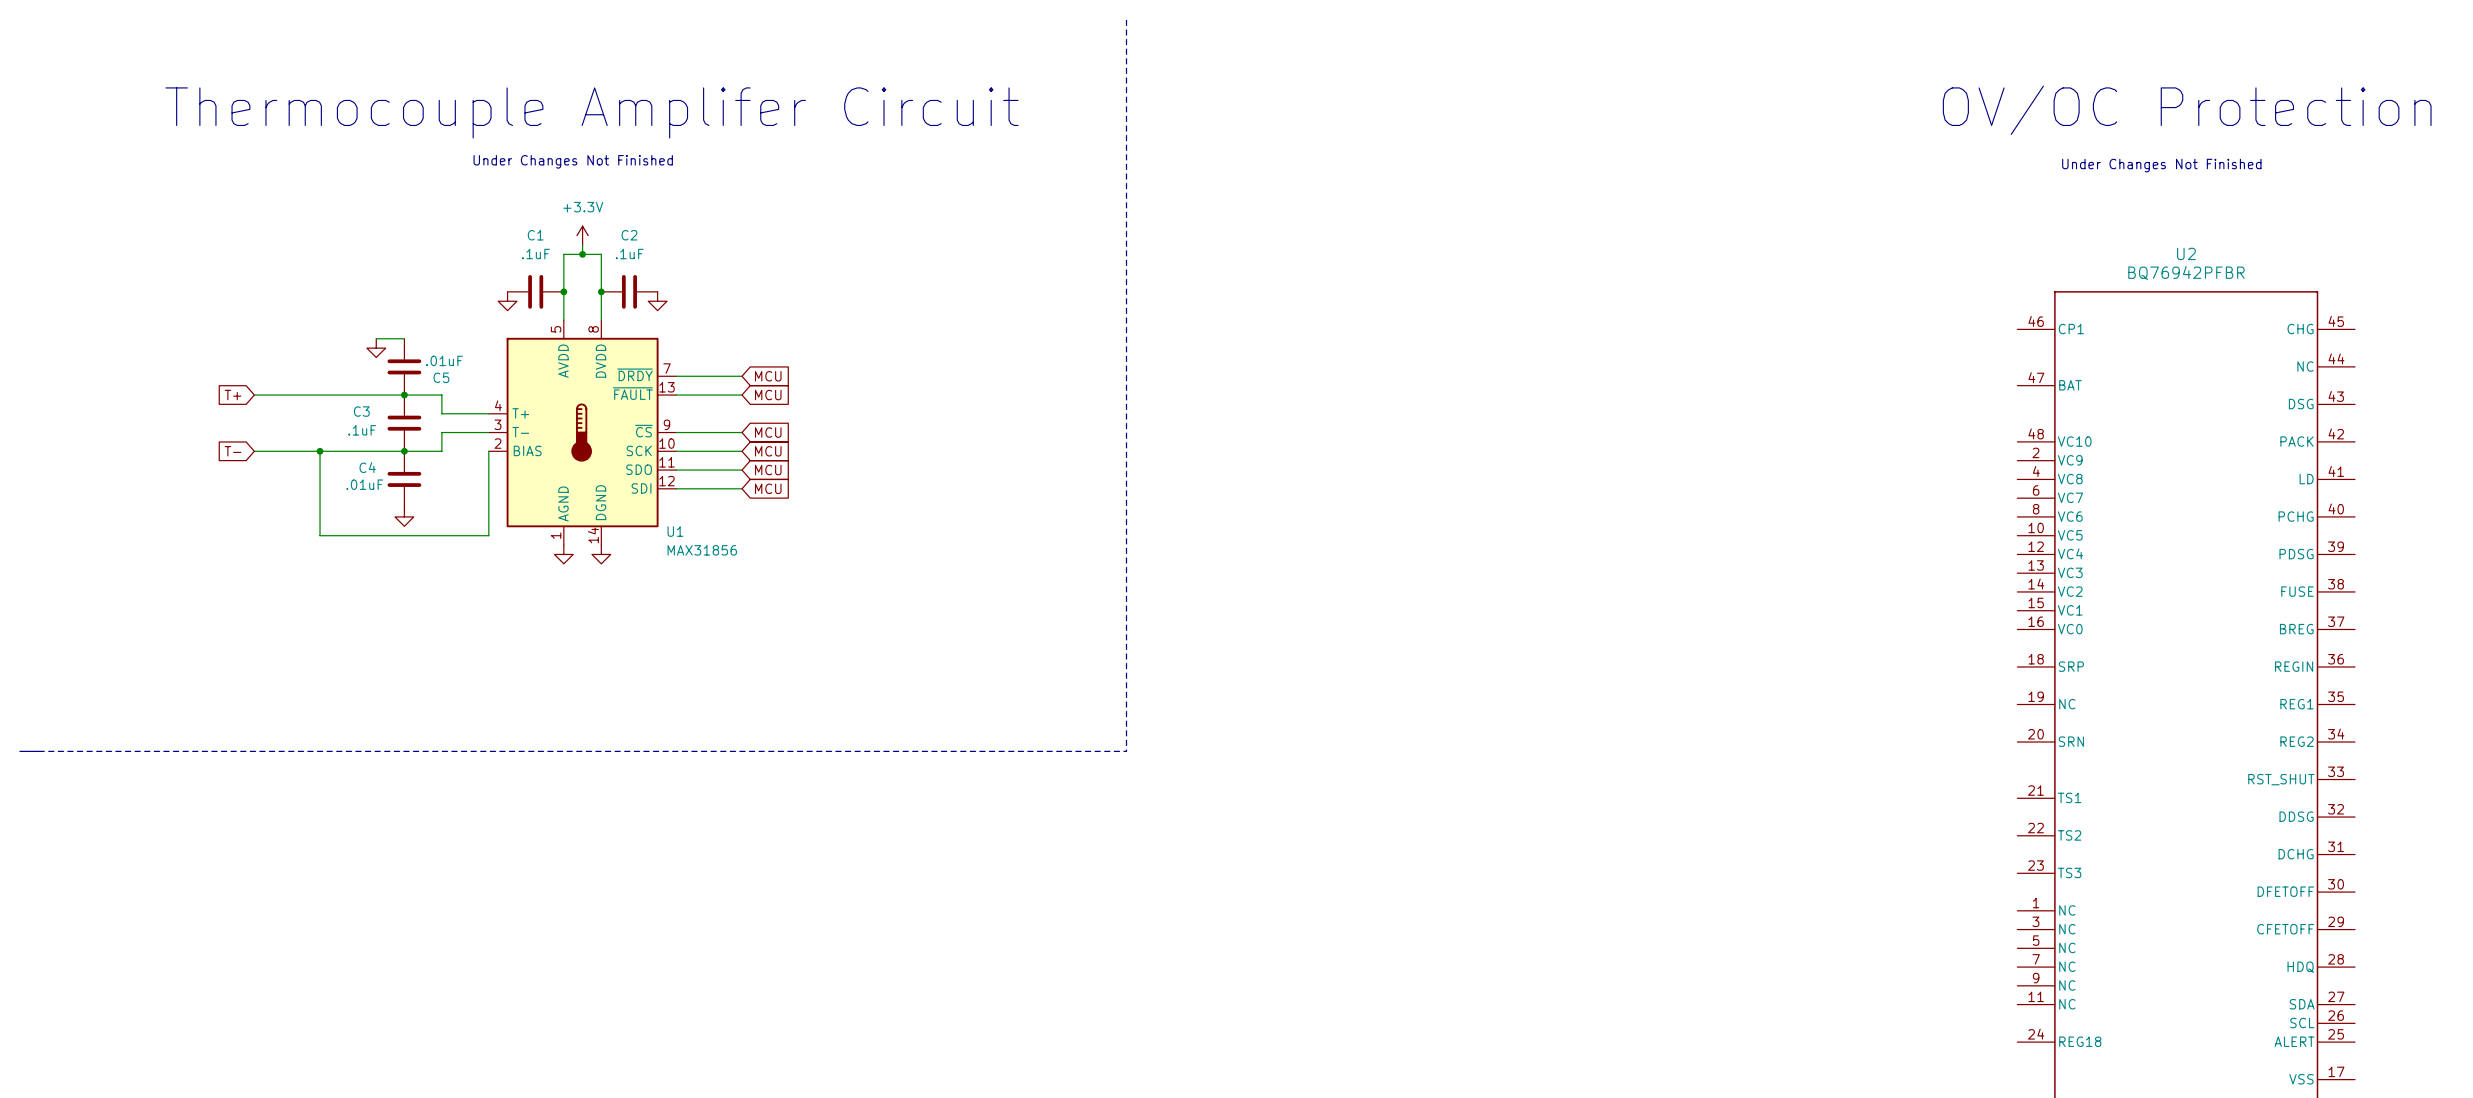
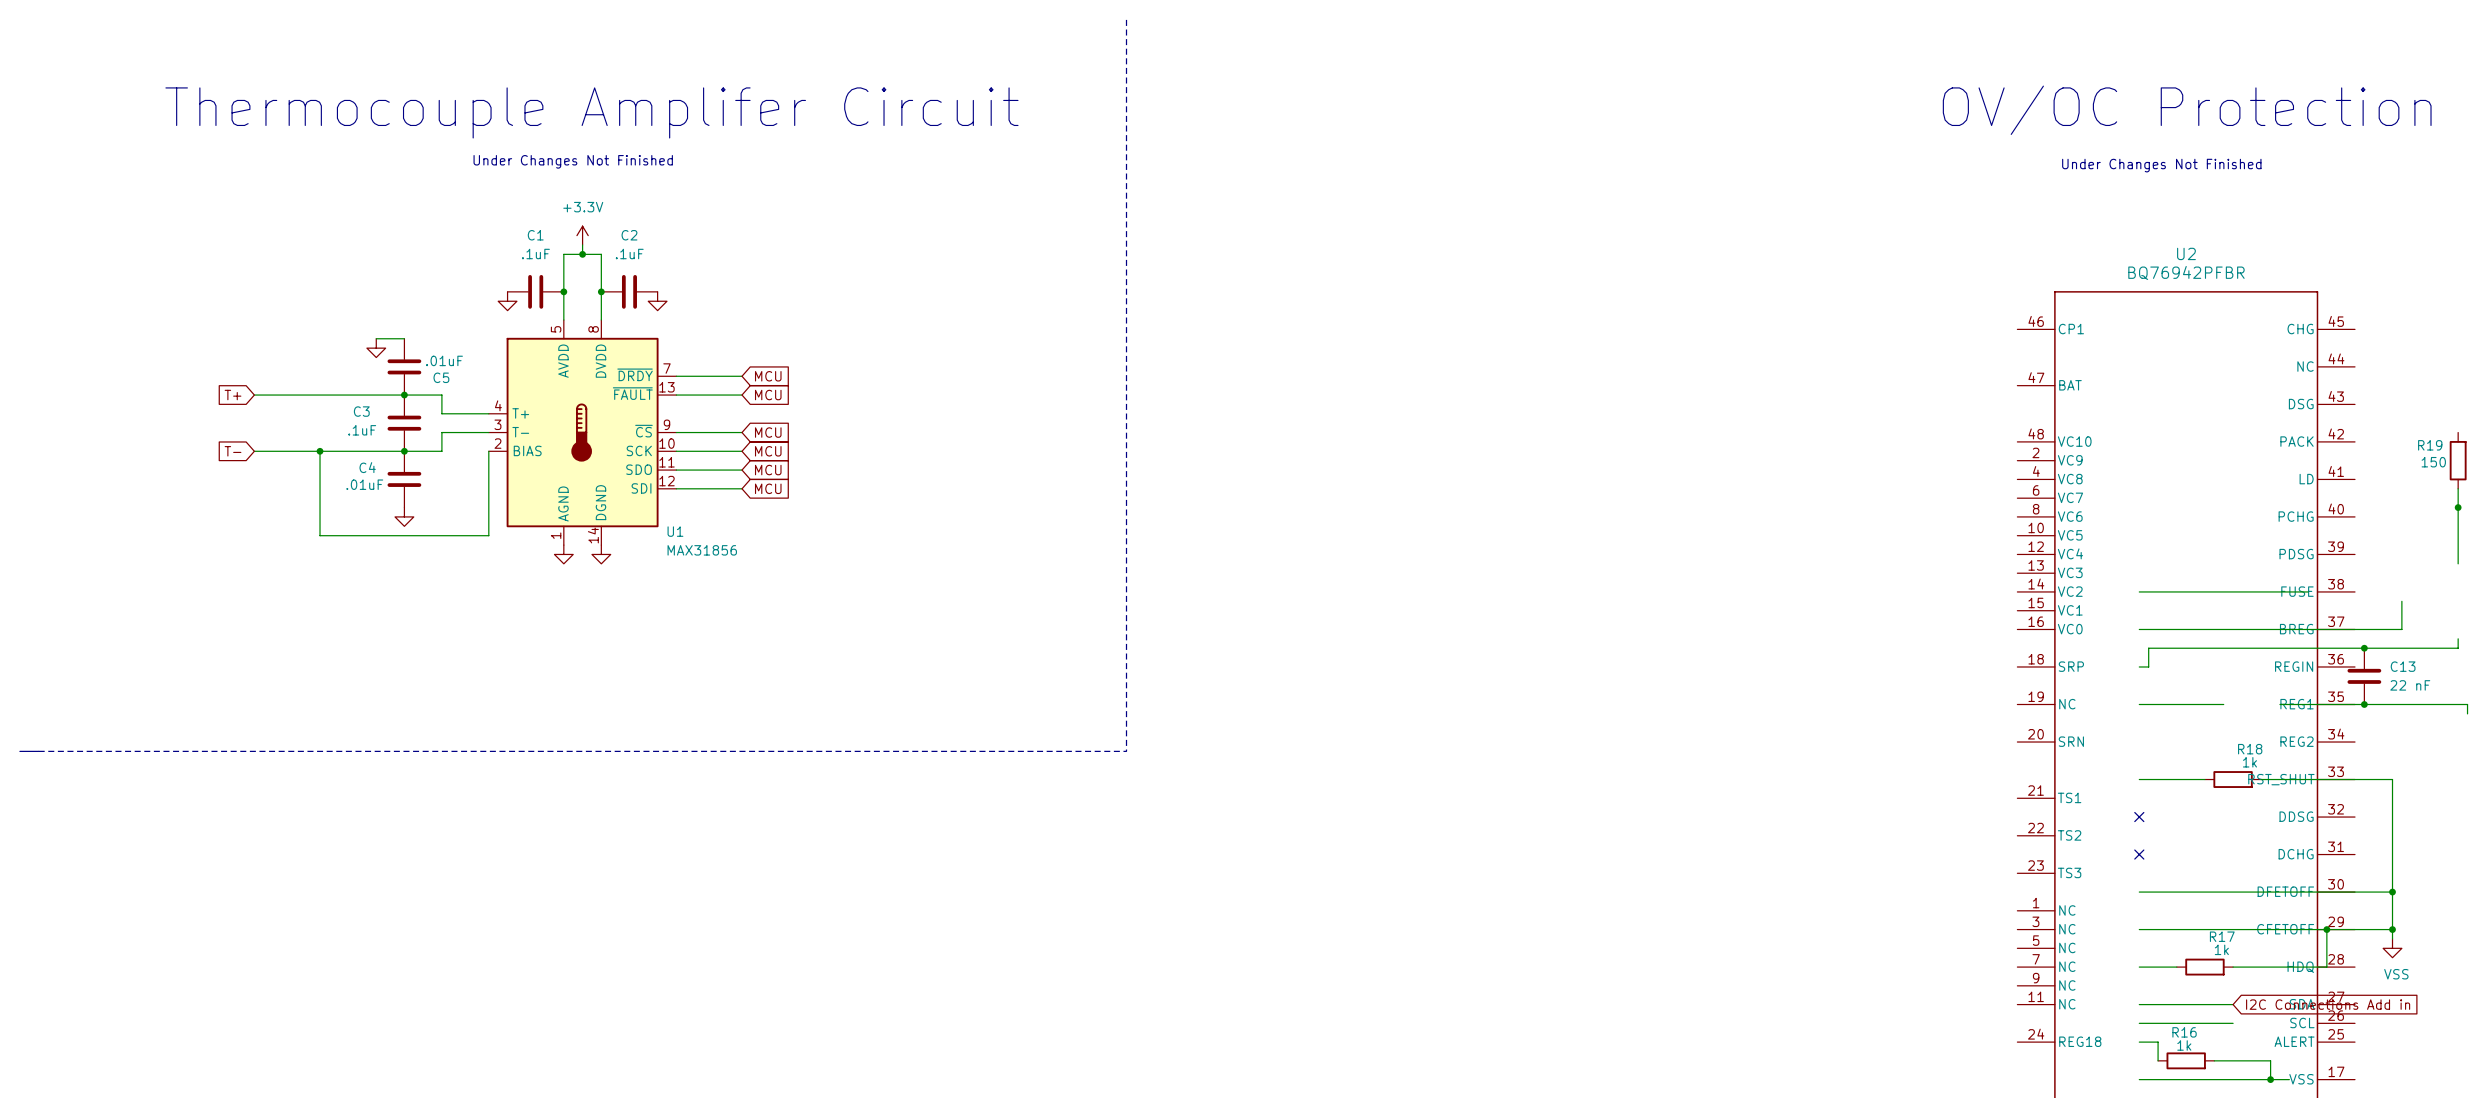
R19: none -> 150 (2458, 460)
wire: none -> (2458, 488) (2458, 563)
junction: none -> (2458, 507)
wire: none -> (2139, 591) (2308, 591)
wire: none -> (2401, 601) (2401, 629) (2139, 629)
wire: none -> (2458, 638) (2458, 648) (2148, 648) (2148, 666) (2139, 666)
junction: none -> (2364, 648)
C13: none -> 22 nF (2364, 676)
wire: none -> (2139, 704) (2223, 704)
wire: none -> (2279, 704) (2467, 704) (2467, 713)
junction: none -> (2364, 704)
wire: none -> (2139, 779) (2204, 779)
R18: none -> 1k (2233, 779)
wire: none -> (2261, 779) (2392, 779) (2392, 938)
no-connect mark: none -> (2139, 817)
no-connect mark: none -> (2139, 854)
wire: none -> (2139, 892) (2392, 892)
junction: none -> (2392, 892)
wire: none -> (2139, 929) (2392, 929)
wire: none -> (2326, 929) (2326, 967) (2233, 967)
junction: none -> (2326, 929)
junction: none -> (2392, 929)
power symbol: none -> VSS (2392, 948)
wire: none -> (2139, 967) (2176, 967)
R17: none -> 1k (2204, 967)
wire: none -> (2139, 1004) (2233, 1004)
global label: none -> I2C Connections Add in (2328, 1004)
wire: none -> (2139, 1023) (2233, 1023)
wire: none -> (2139, 1042) (2158, 1042) (2158, 1060)
R16: none -> 1k (2186, 1060)
wire: none -> (2214, 1060) (2270, 1060) (2270, 1079)
wire: none -> (2139, 1079) (2289, 1079)
junction: none -> (2270, 1079)

